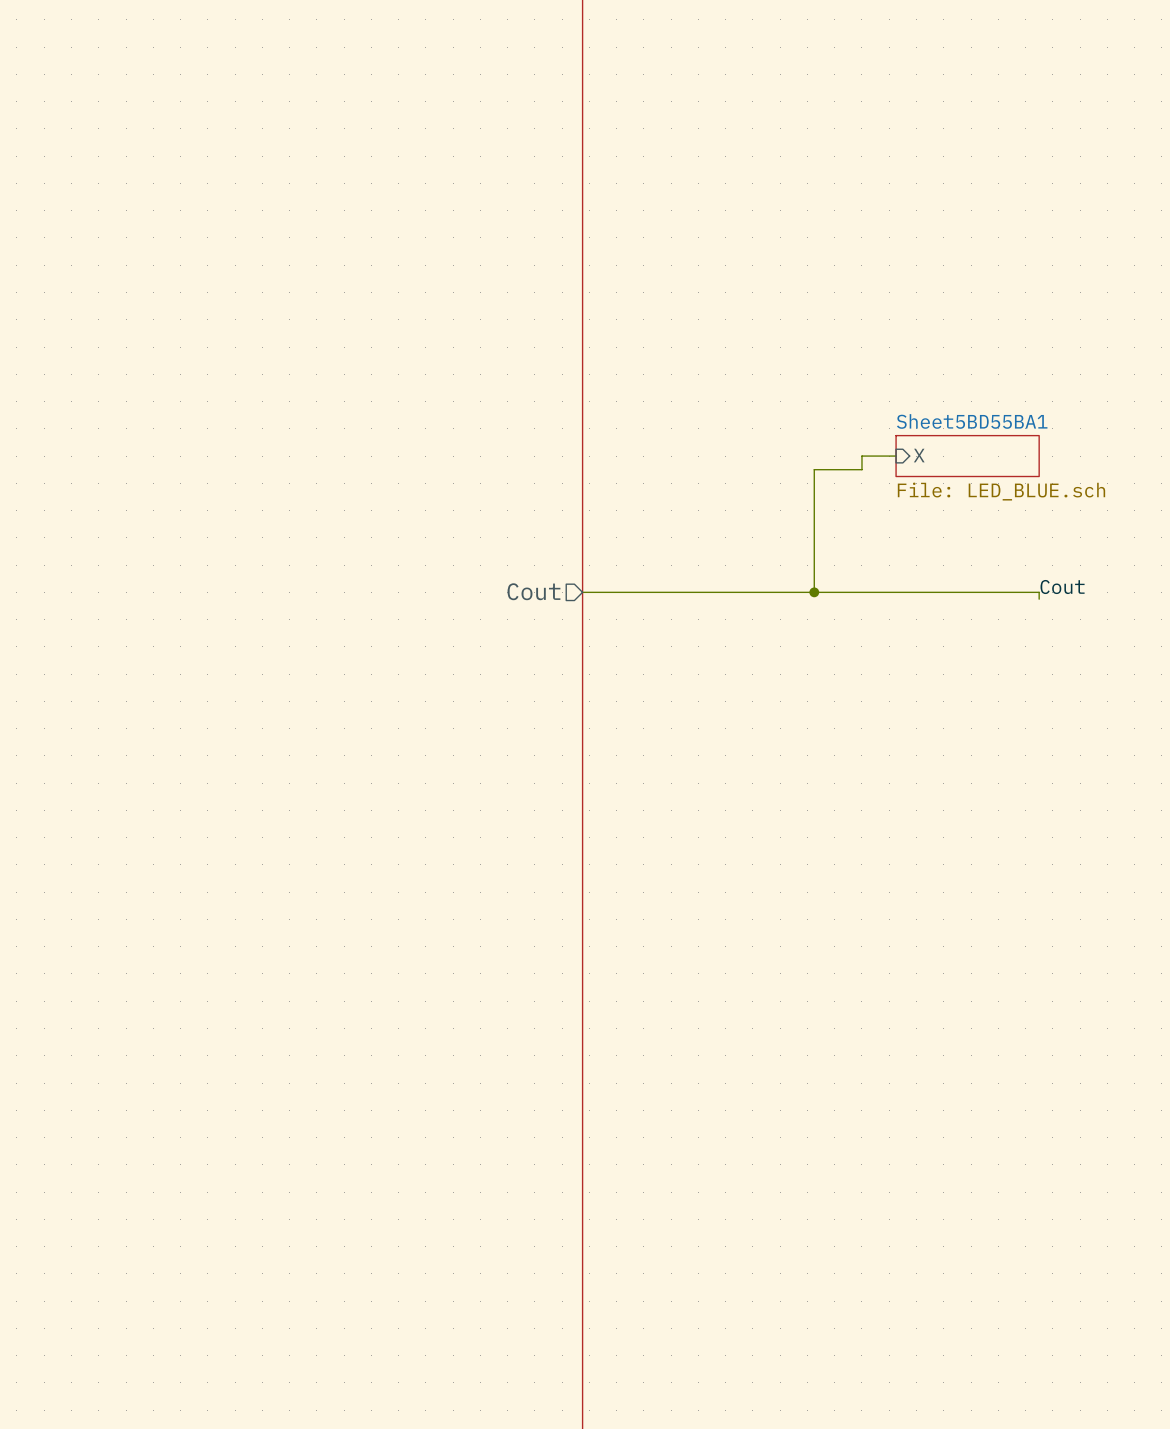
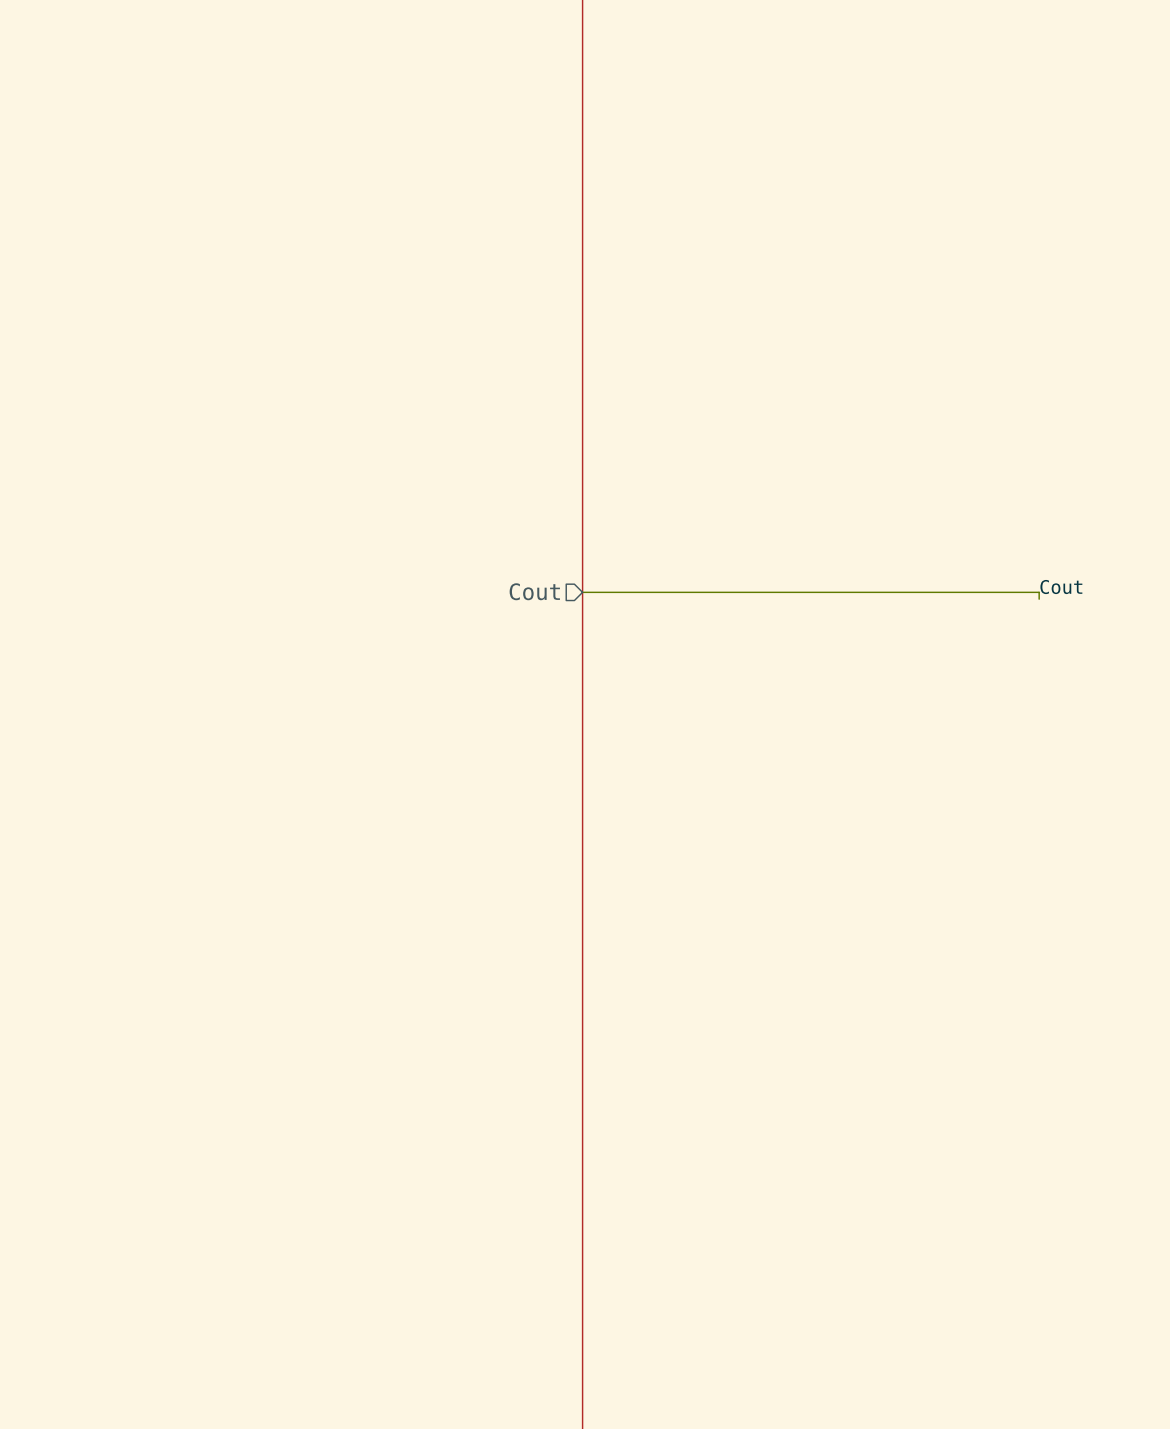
sheet pin: X (919, 455) -> none
wire: (896, 456) (861, 456) (861, 469) (814, 469) (814, 592) -> none
sheet Sheet5BD55BA1: File: LED_BLUE.sch (967, 456) -> none
junction: (814, 592) -> none

